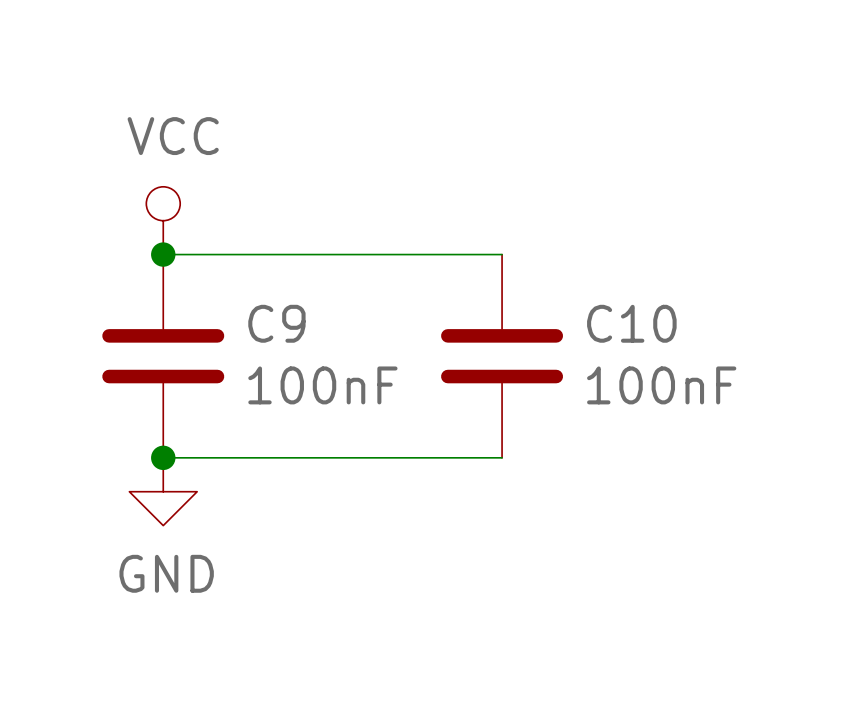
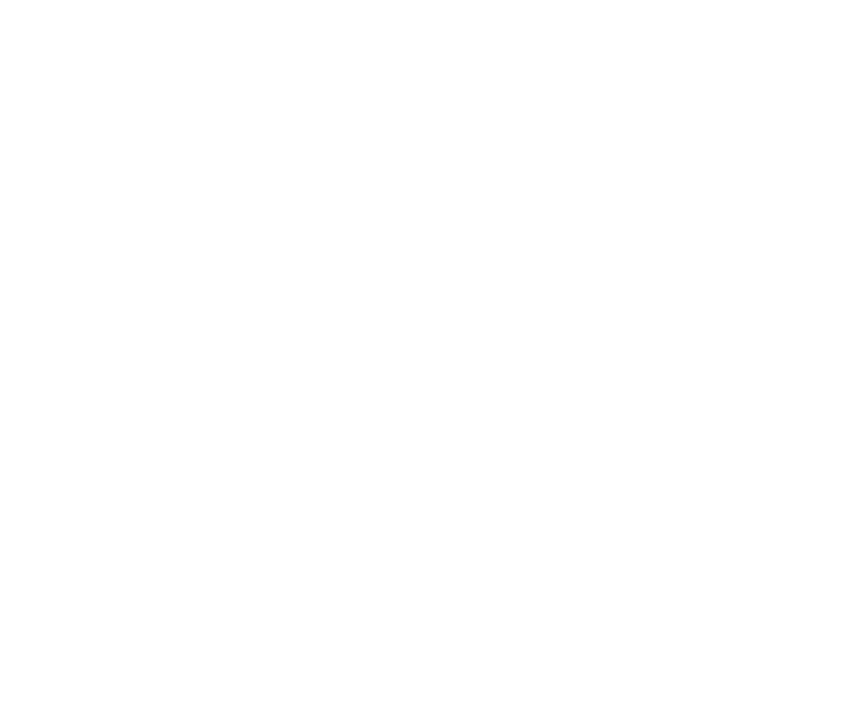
power symbol: VCC (163, 220) -> none
wire: (163, 254) (502, 254) -> none
junction: (163, 254) -> none
C9: 100nF (163, 356) -> none
C10: 100nF (502, 356) -> none
wire: (163, 457) (502, 457) -> none
junction: (163, 457) -> none
power symbol: GND (163, 491) -> none

